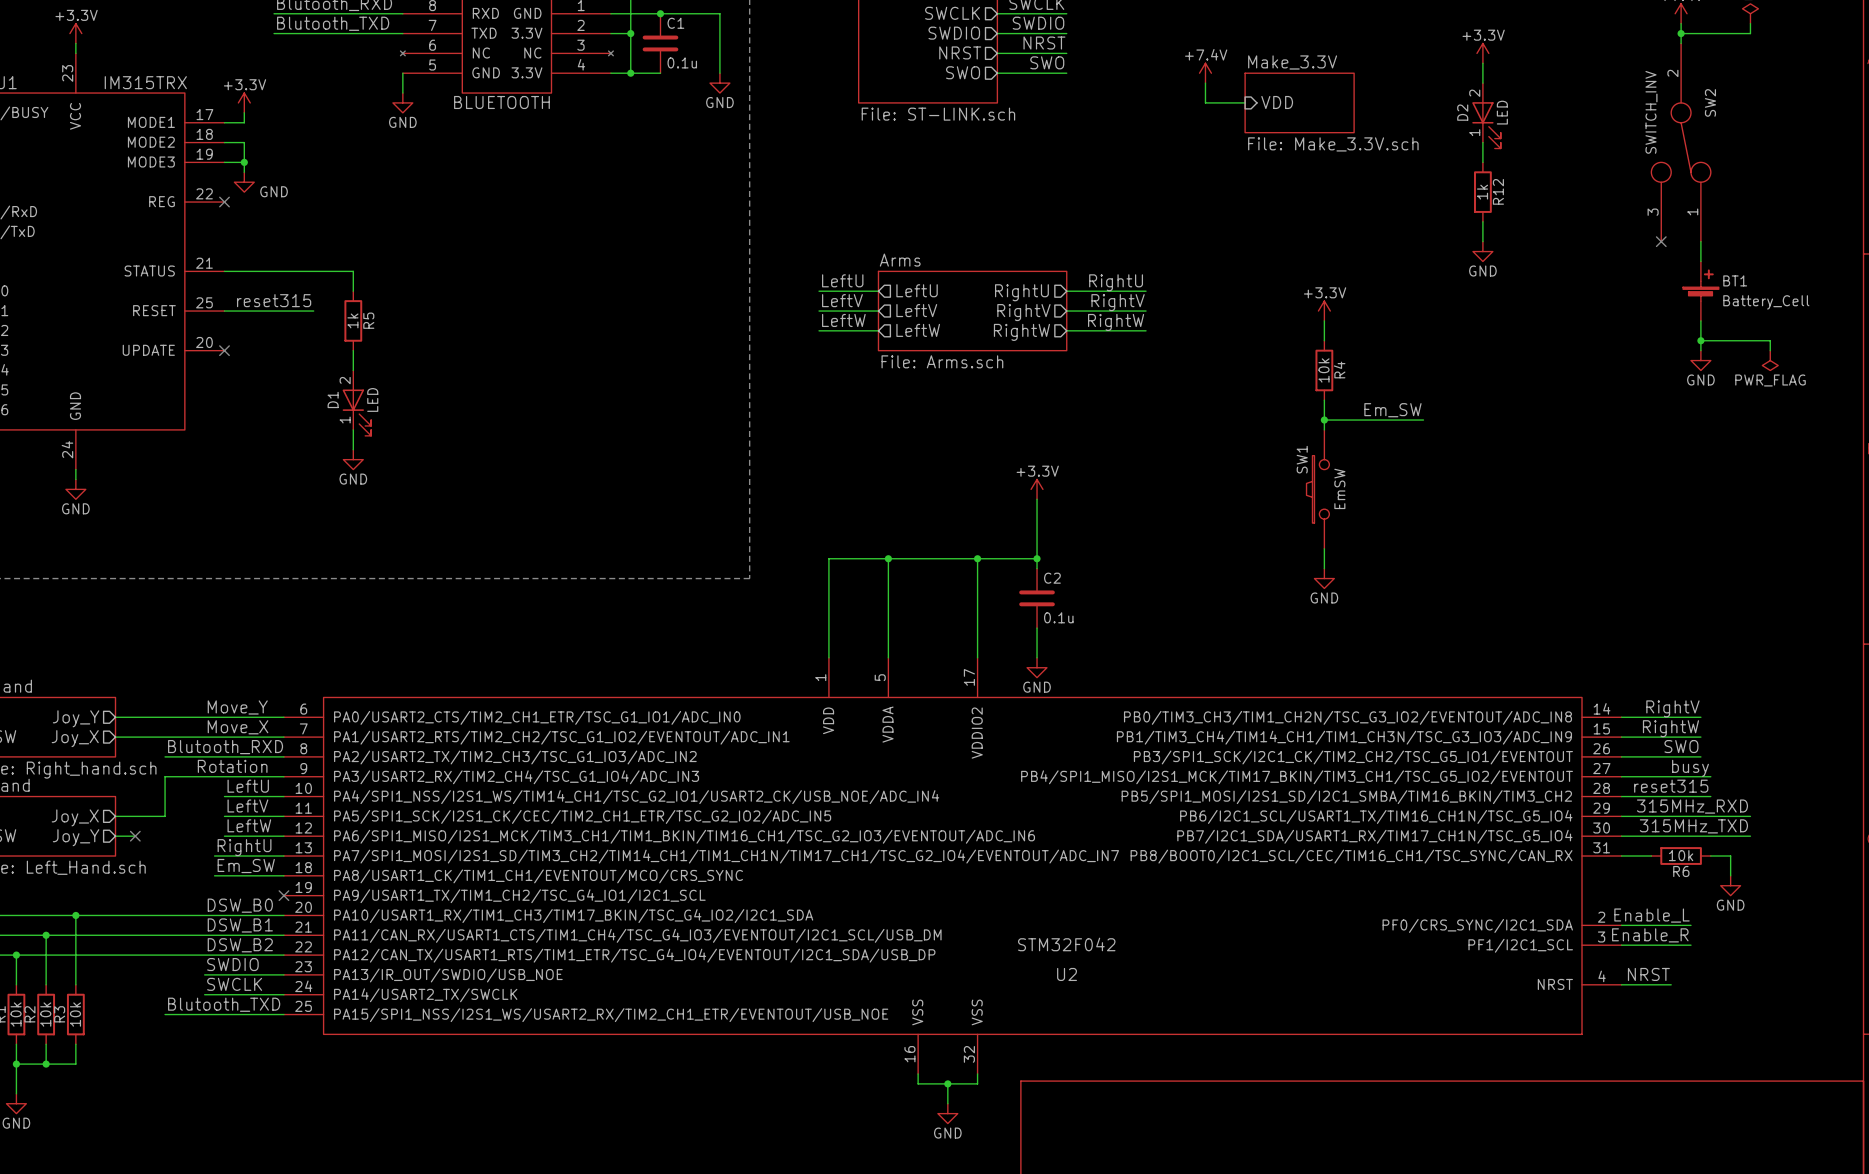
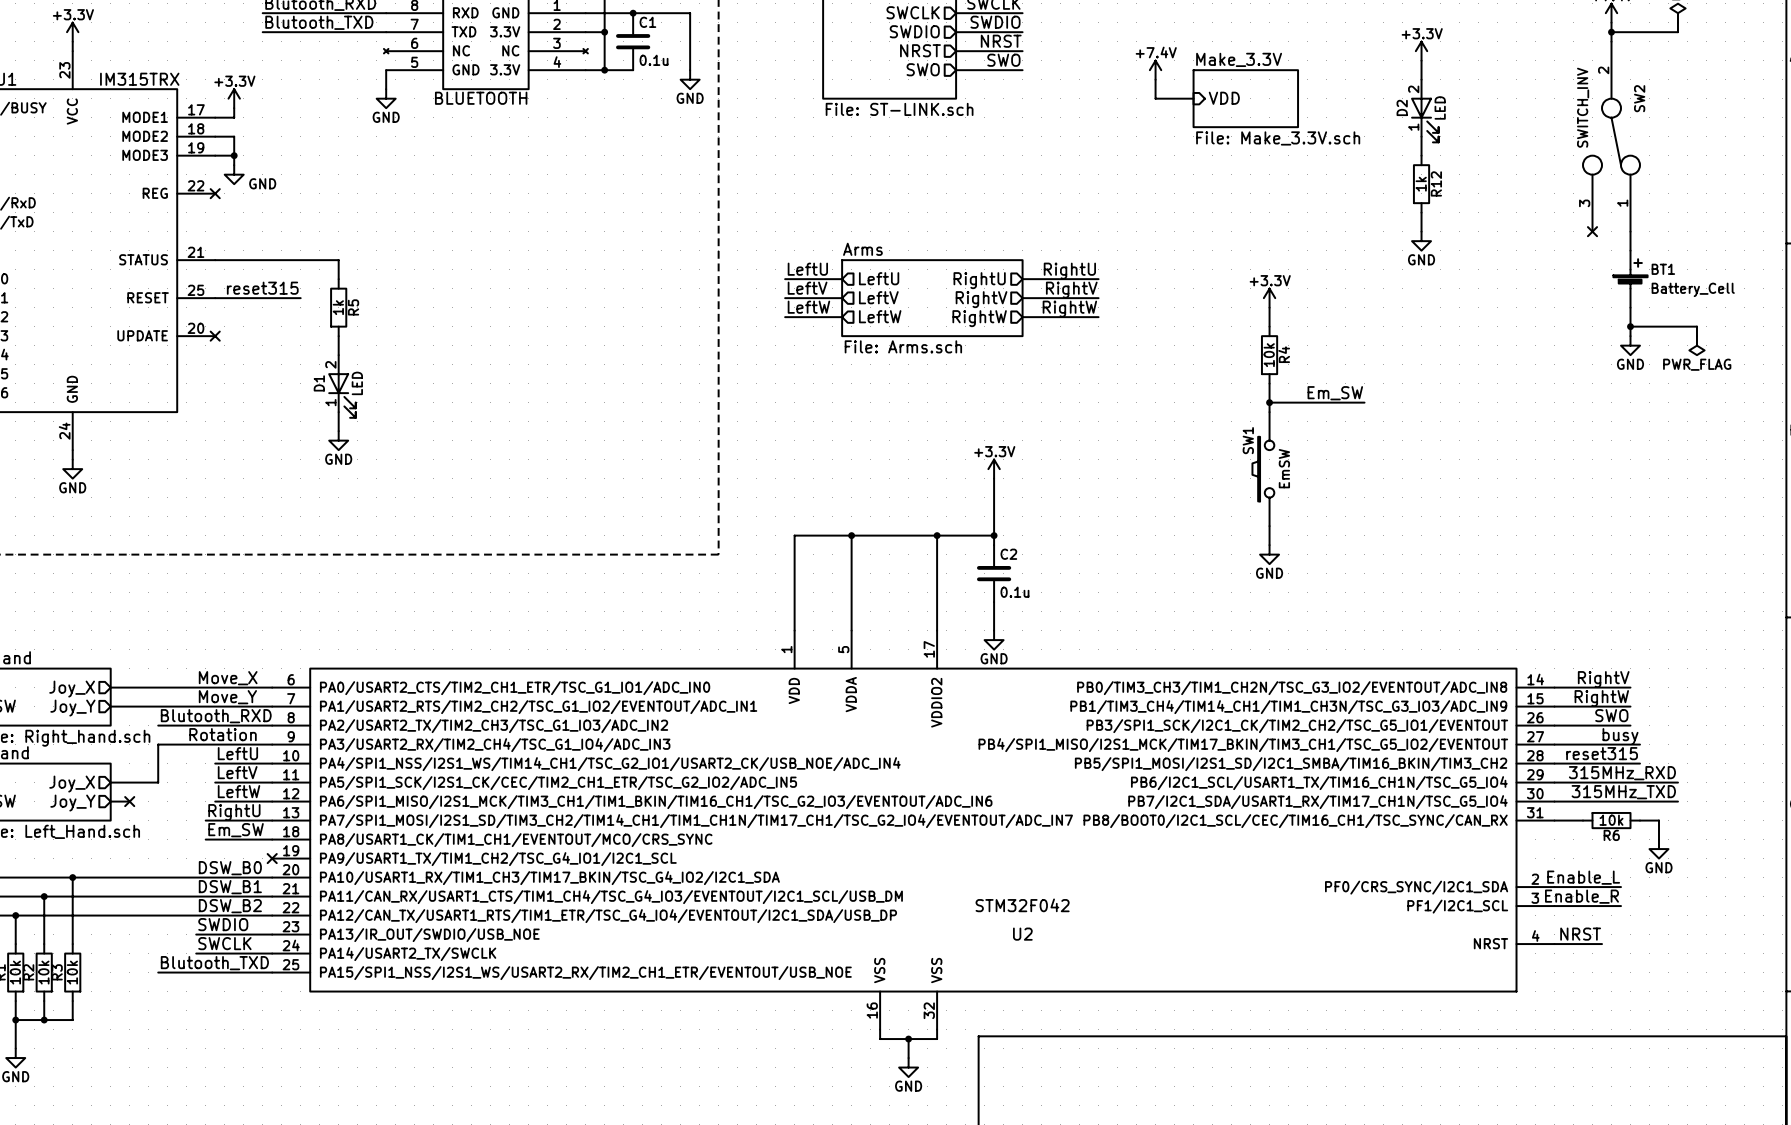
label: Move_Y (237, 707) -> Move_X (228, 678)
sheet pin: Joy_Y (76, 718) -> Joy_X (72, 689)
label: Move_X (238, 727) -> Move_Y (227, 697)
sheet pin: Joy_X (75, 738) -> Joy_Y (72, 708)

